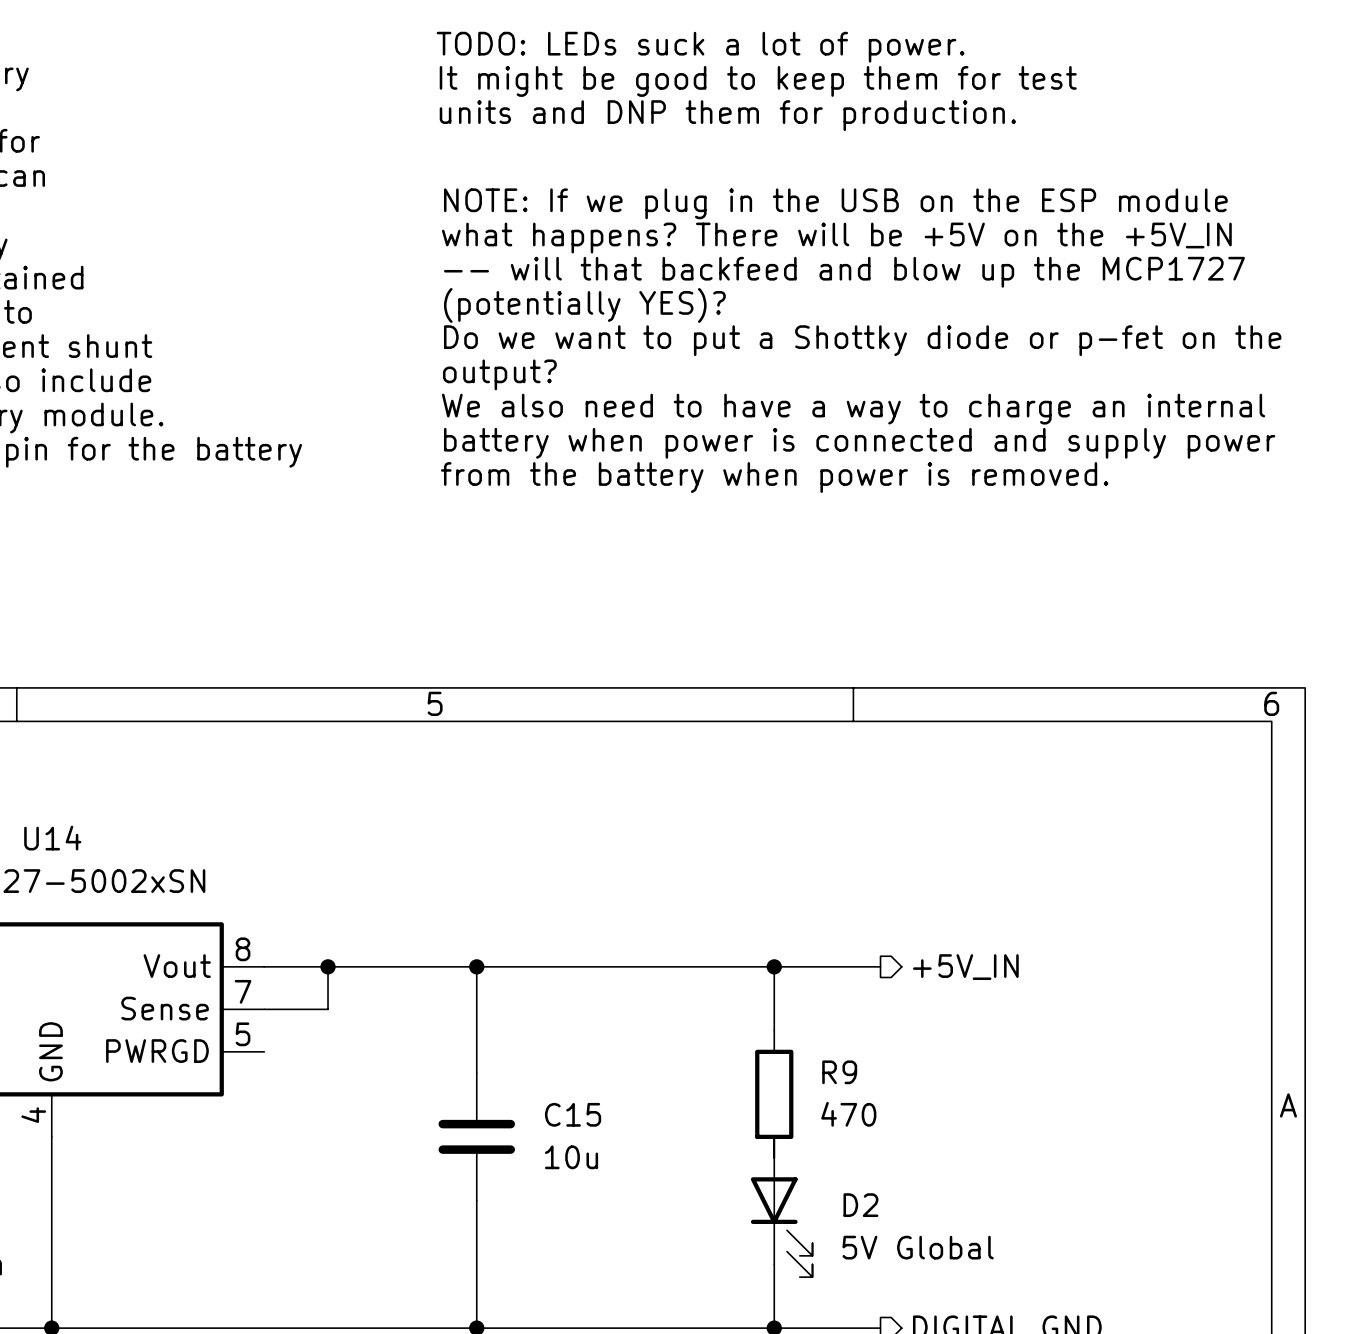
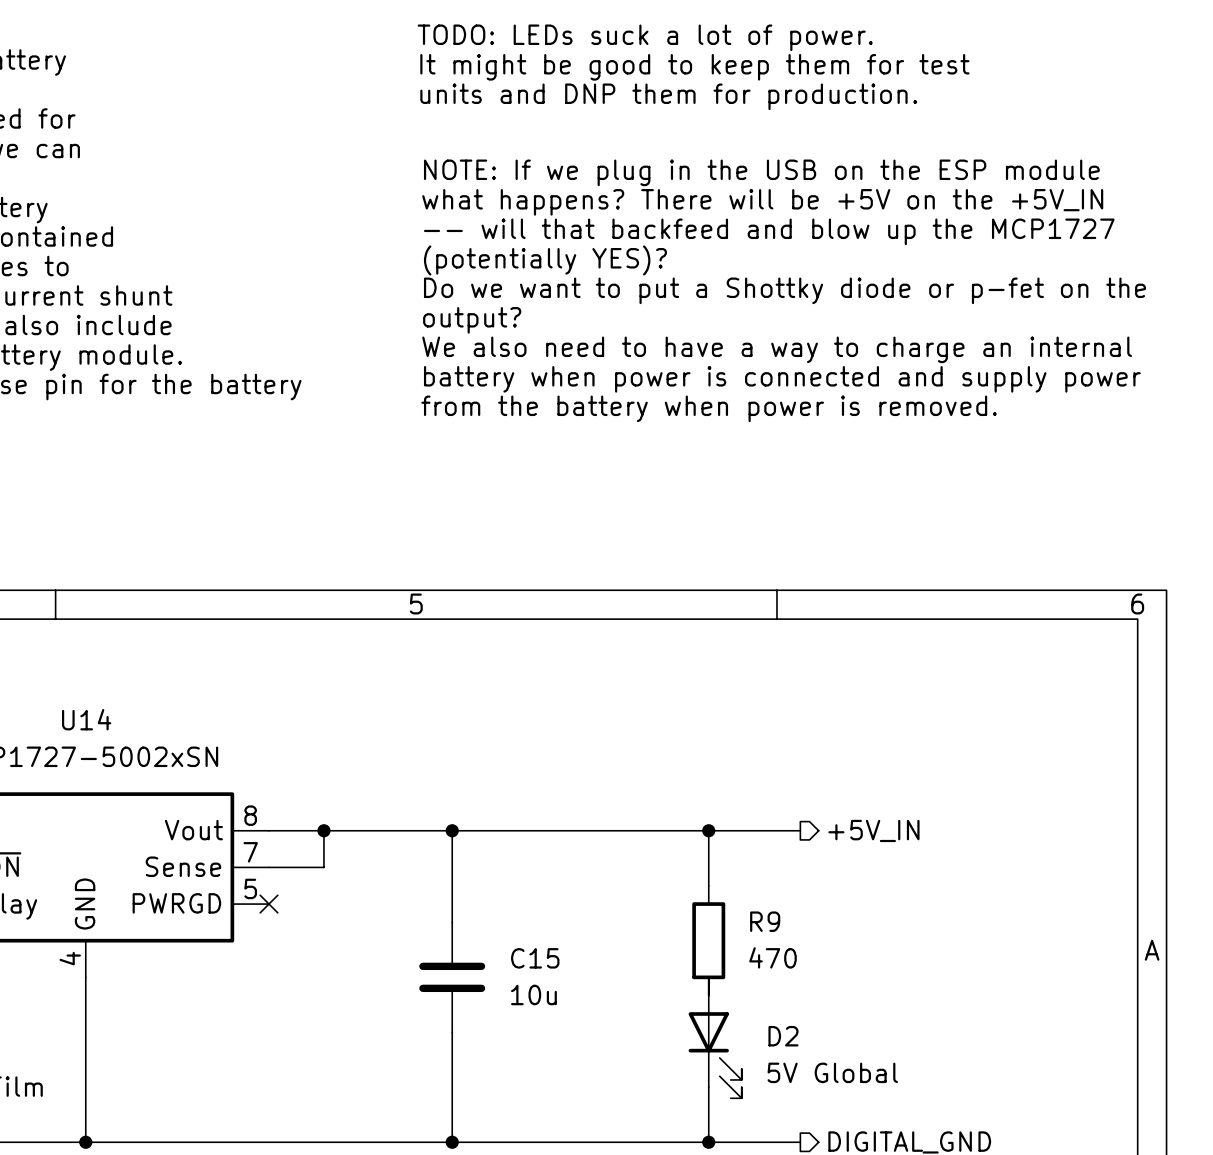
no-connect mark: none -> (269, 904)

